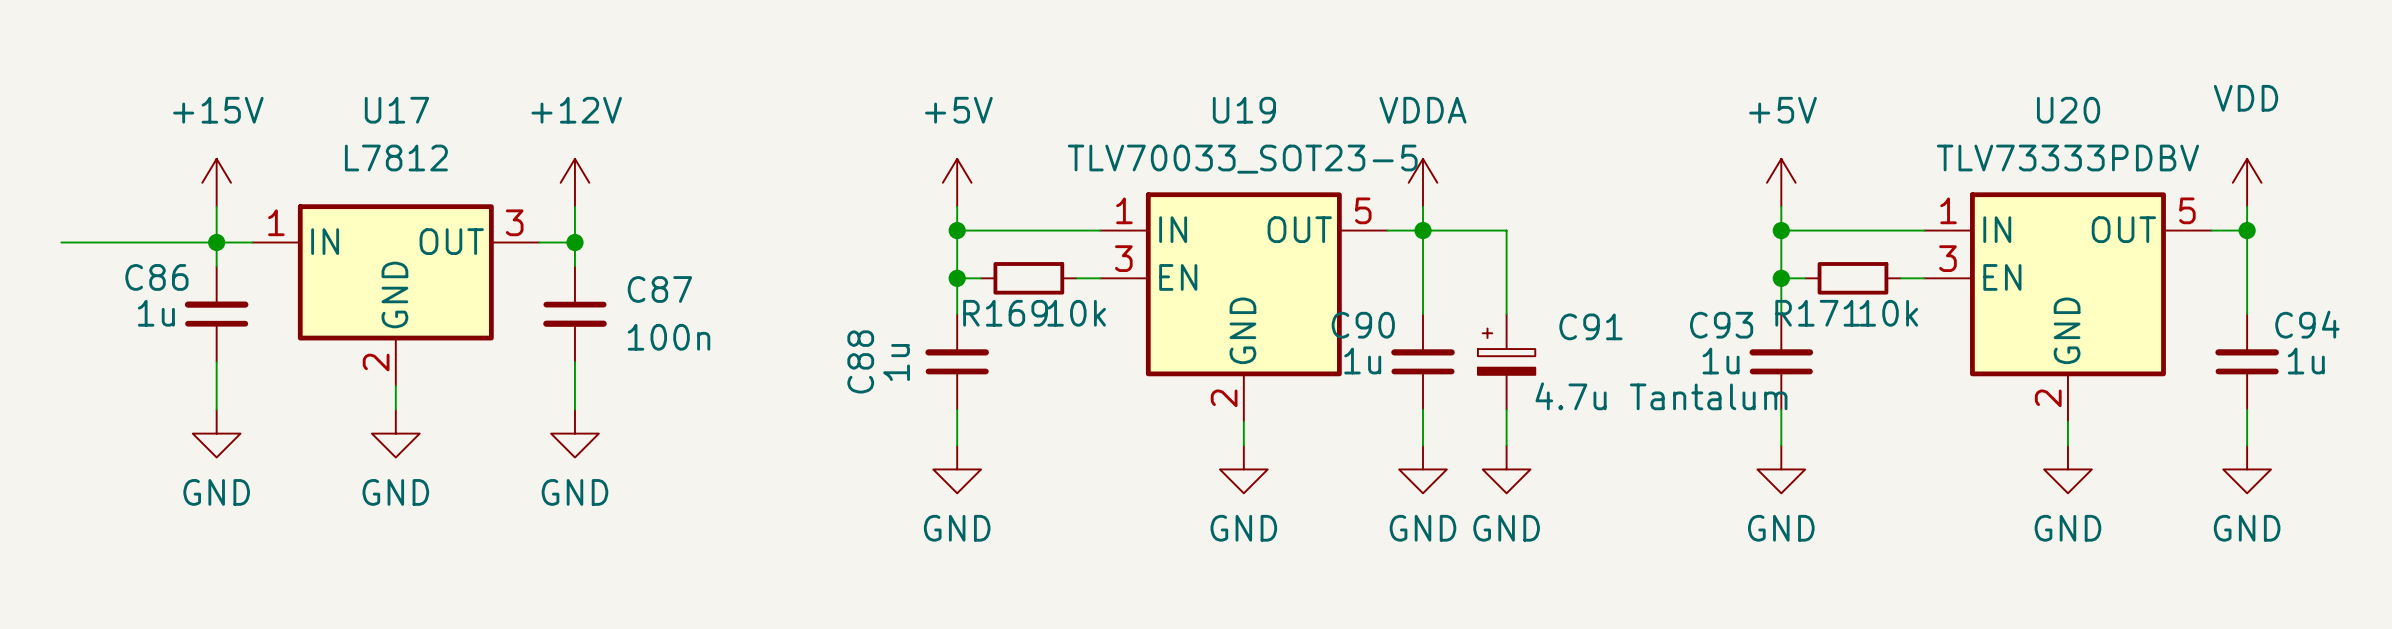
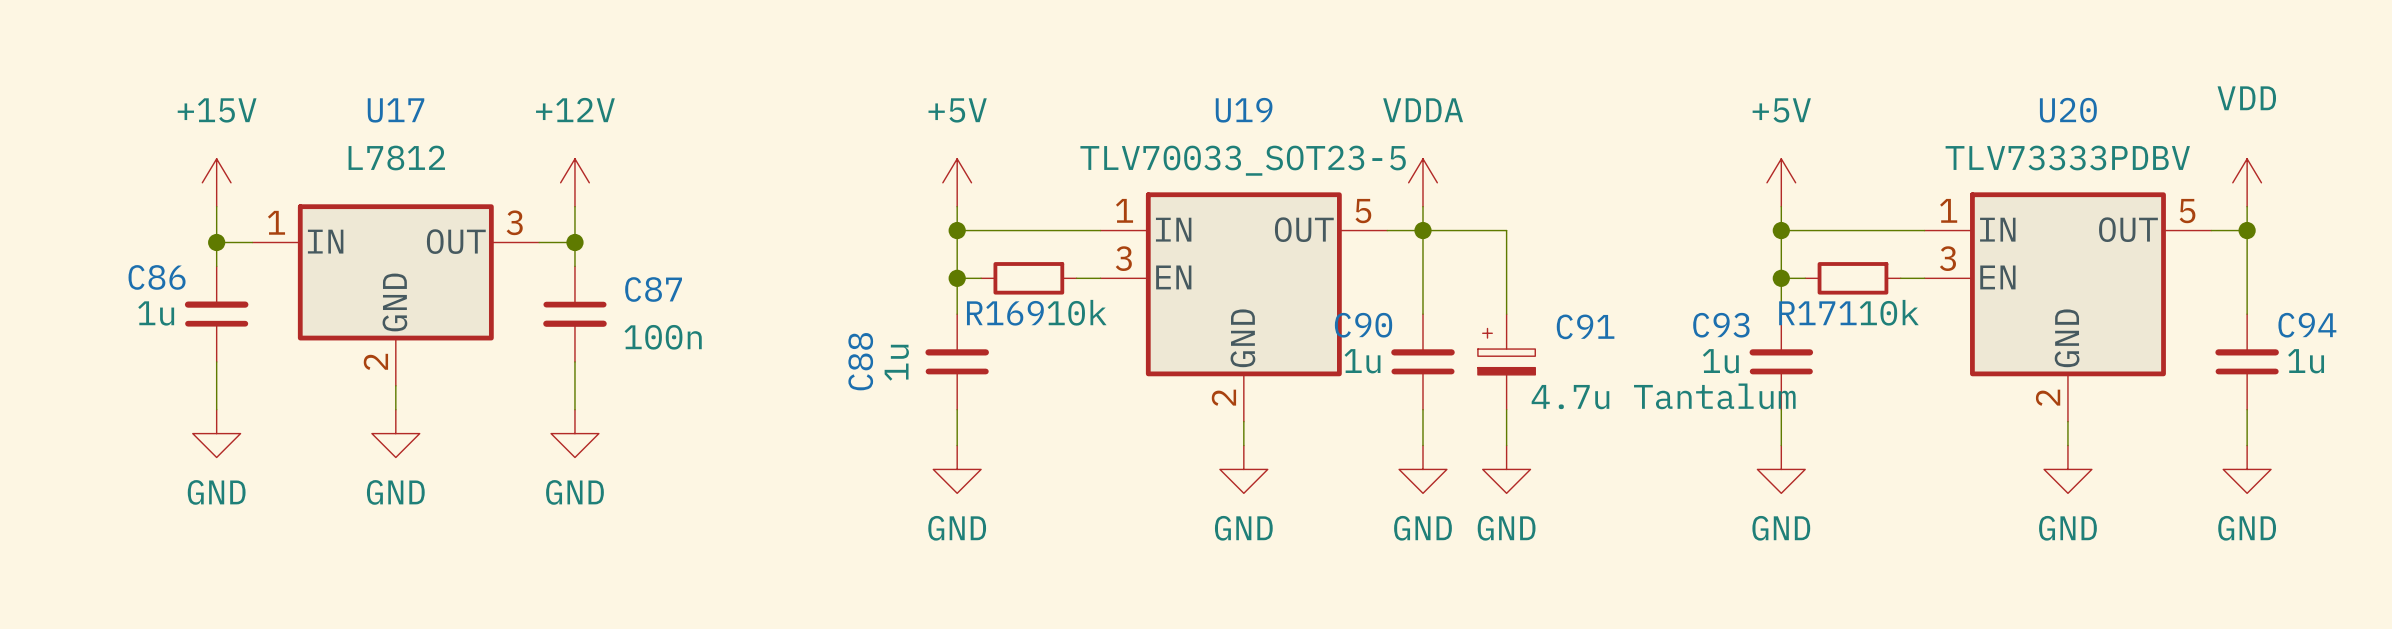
wire: (61, 242) (216, 242) -> none

